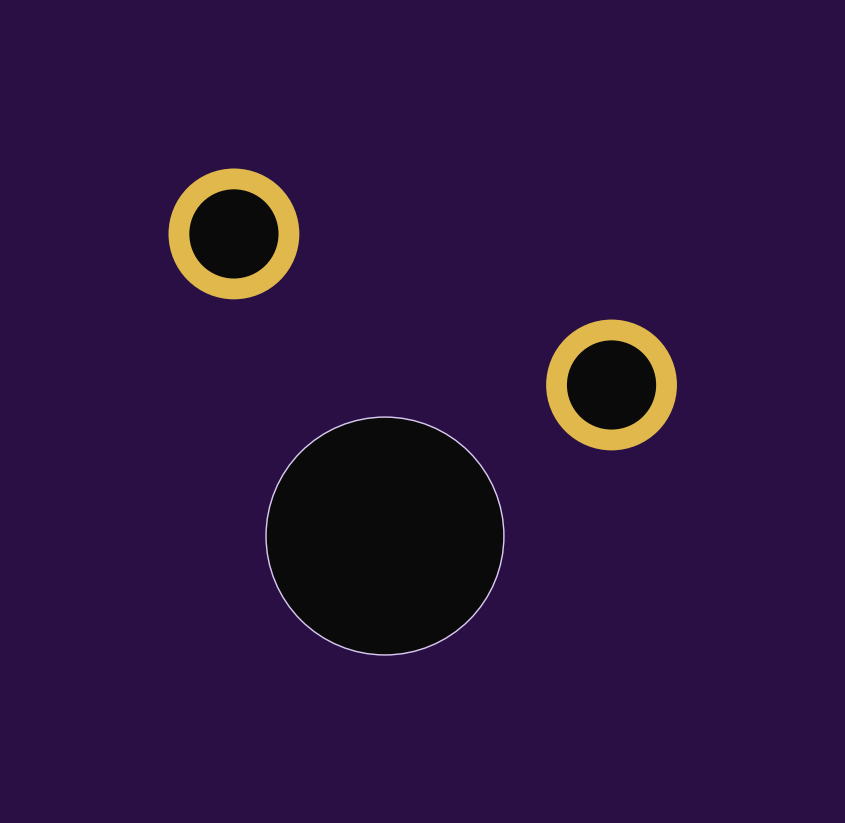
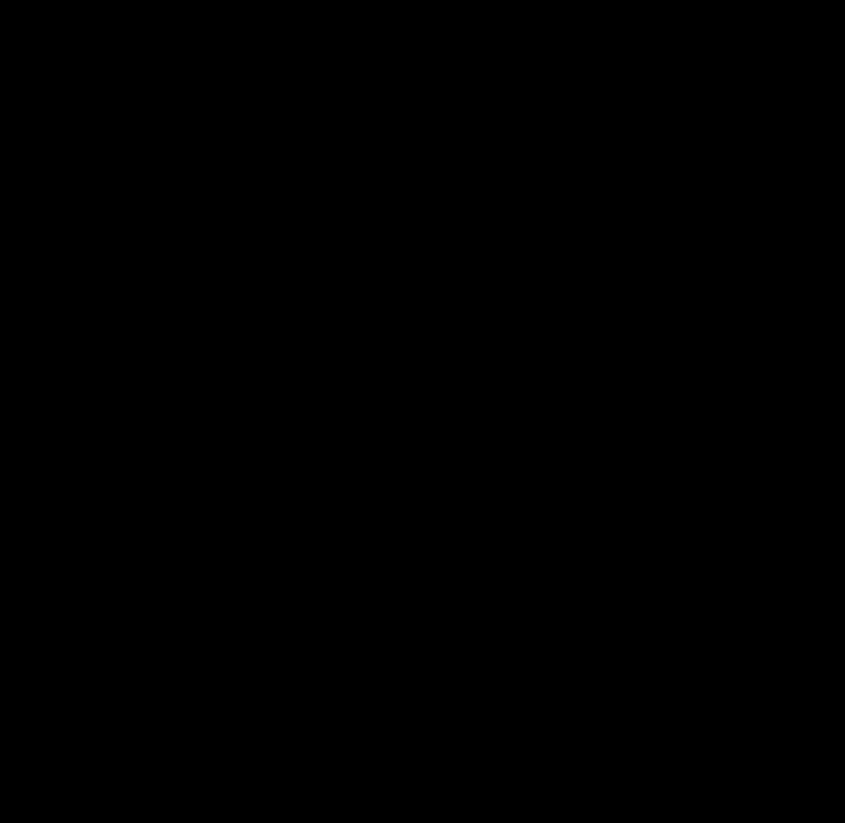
part: (422, 411) -> none

